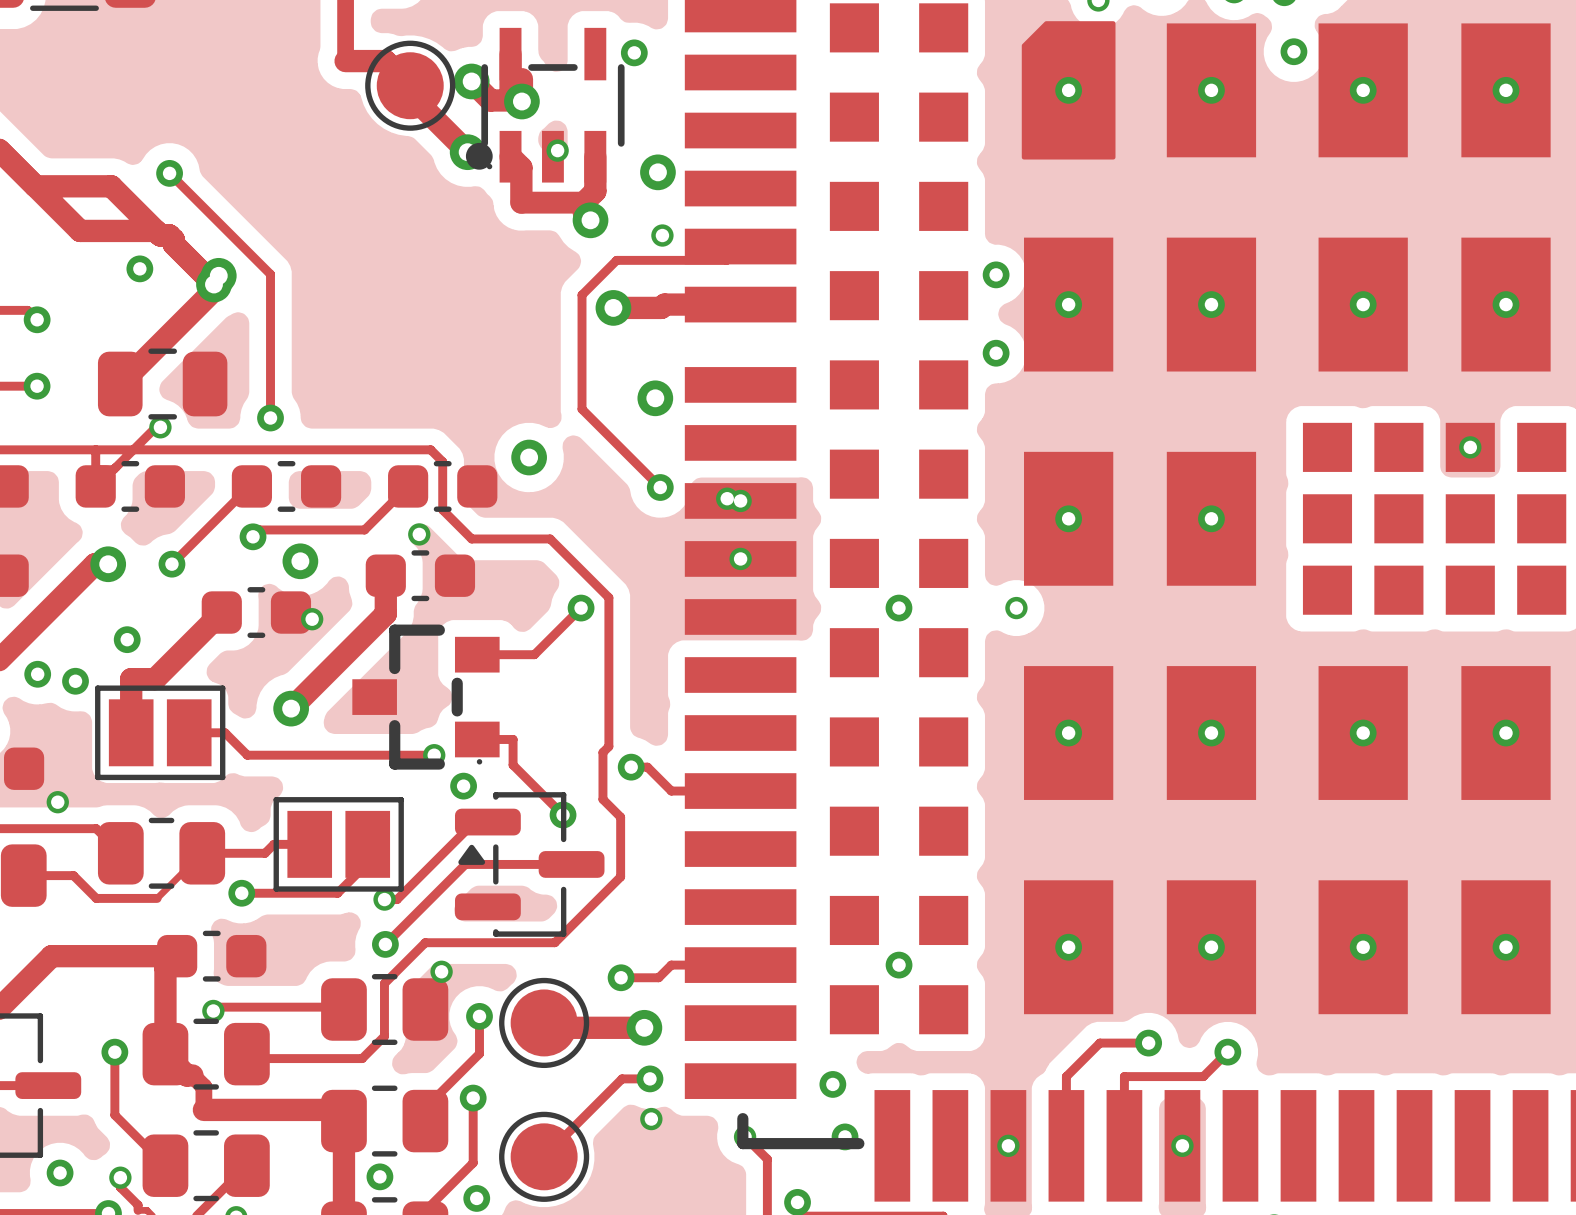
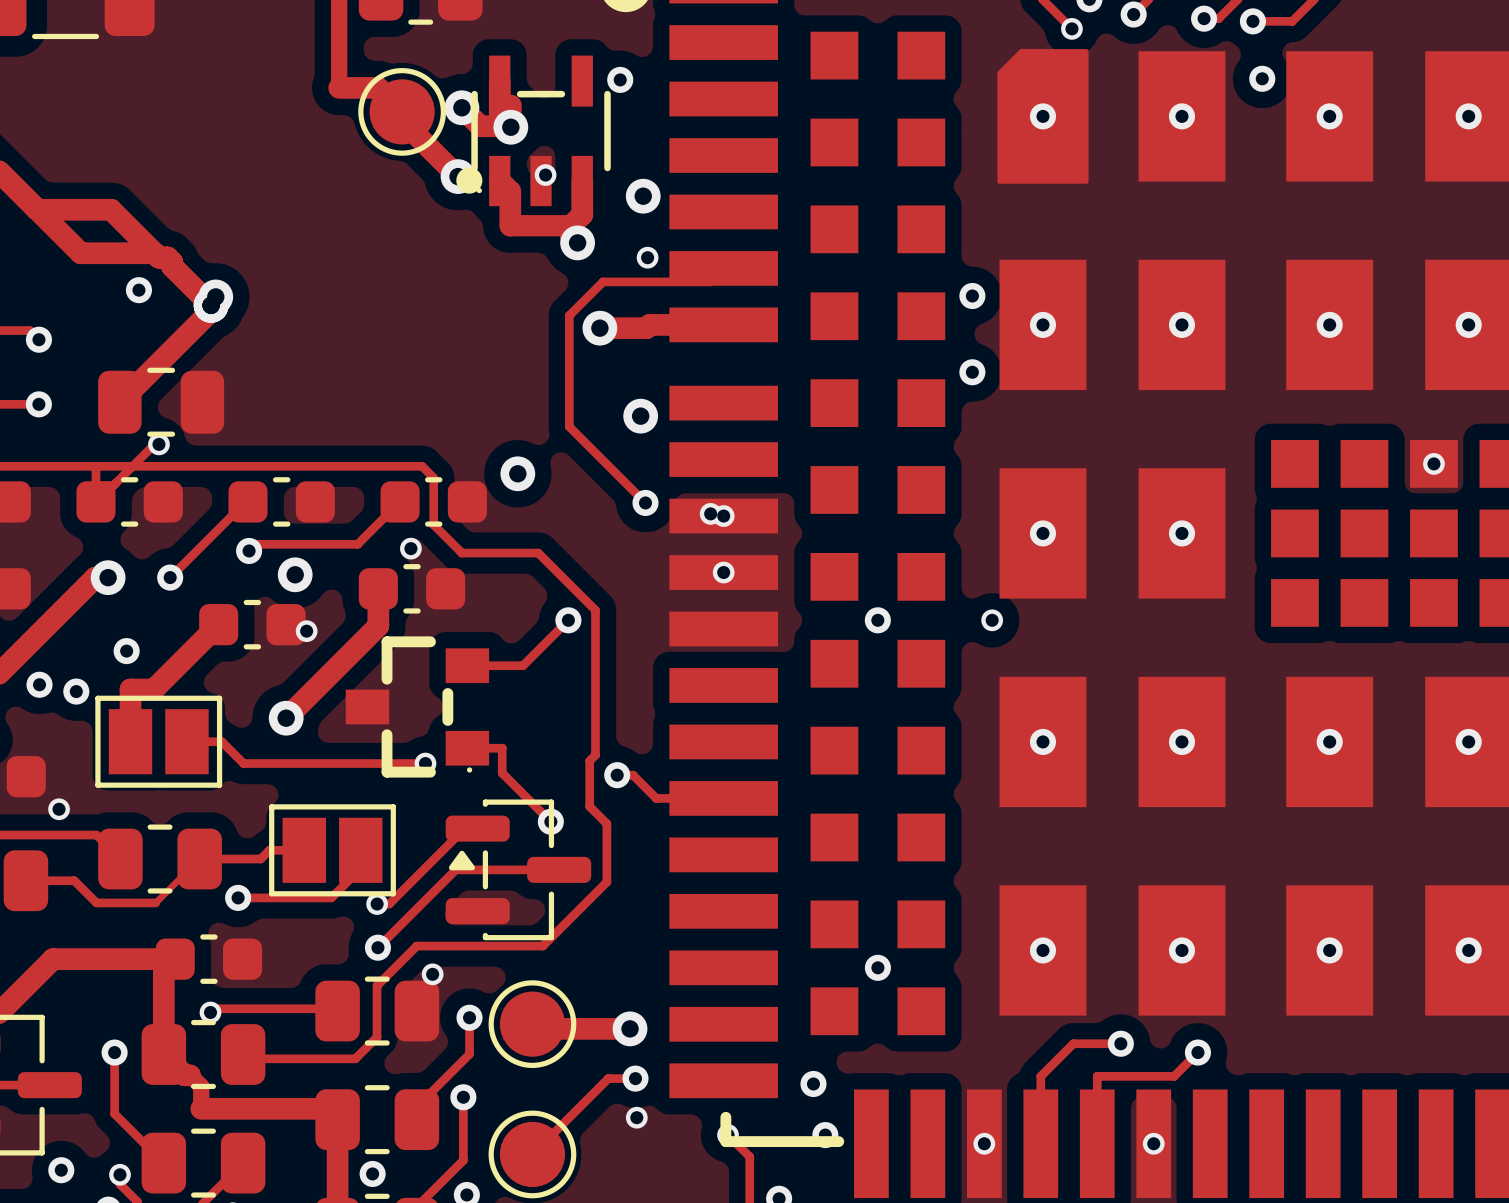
track: (169, 173) (270, 274) (270, 418) -> none
via: (169, 173) -> none
via: (270, 418) -> none
via: (463, 786) -> none
track: (740, 965) (671, 965) (658, 977) (621, 977) -> none
via: (621, 977) -> none

